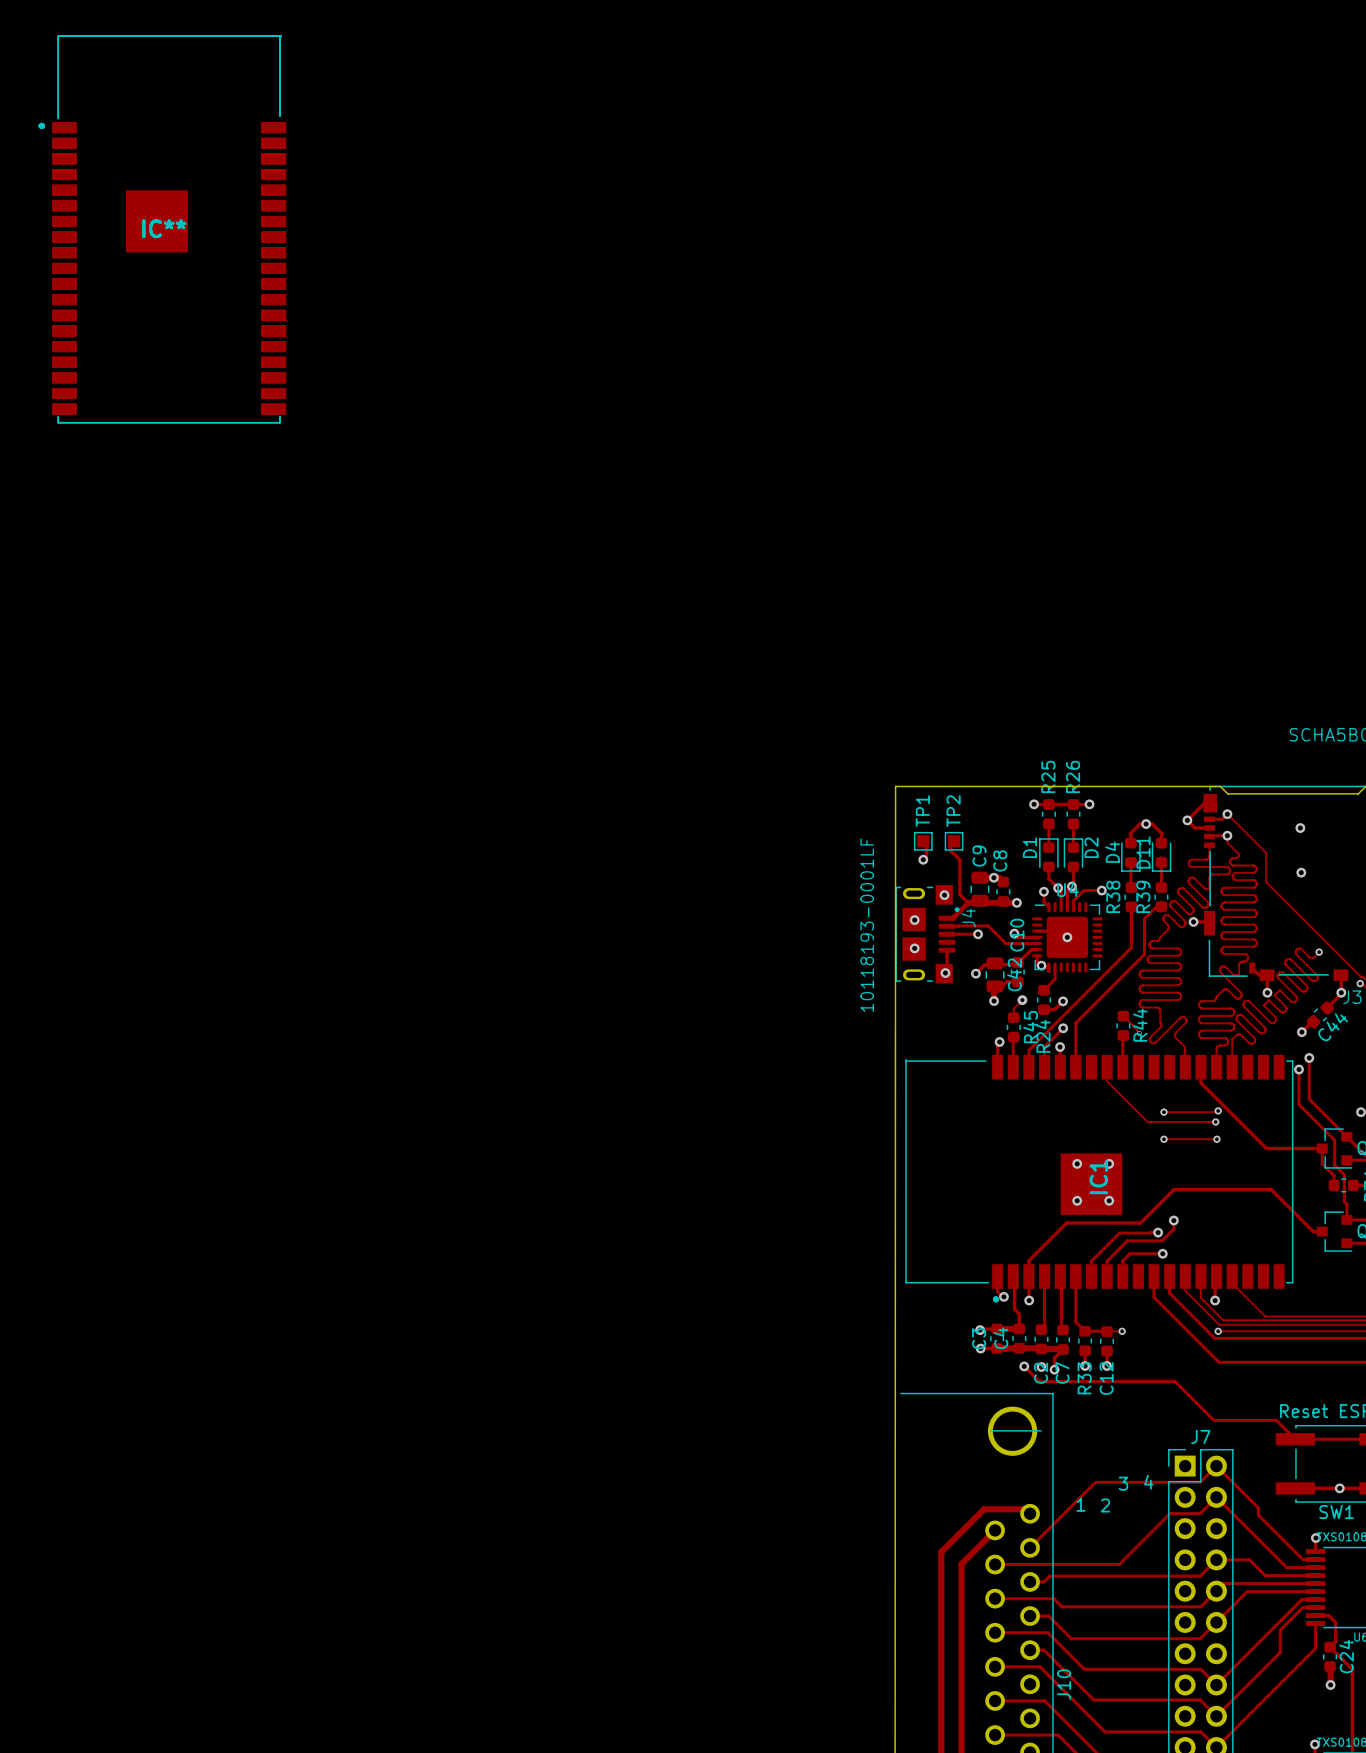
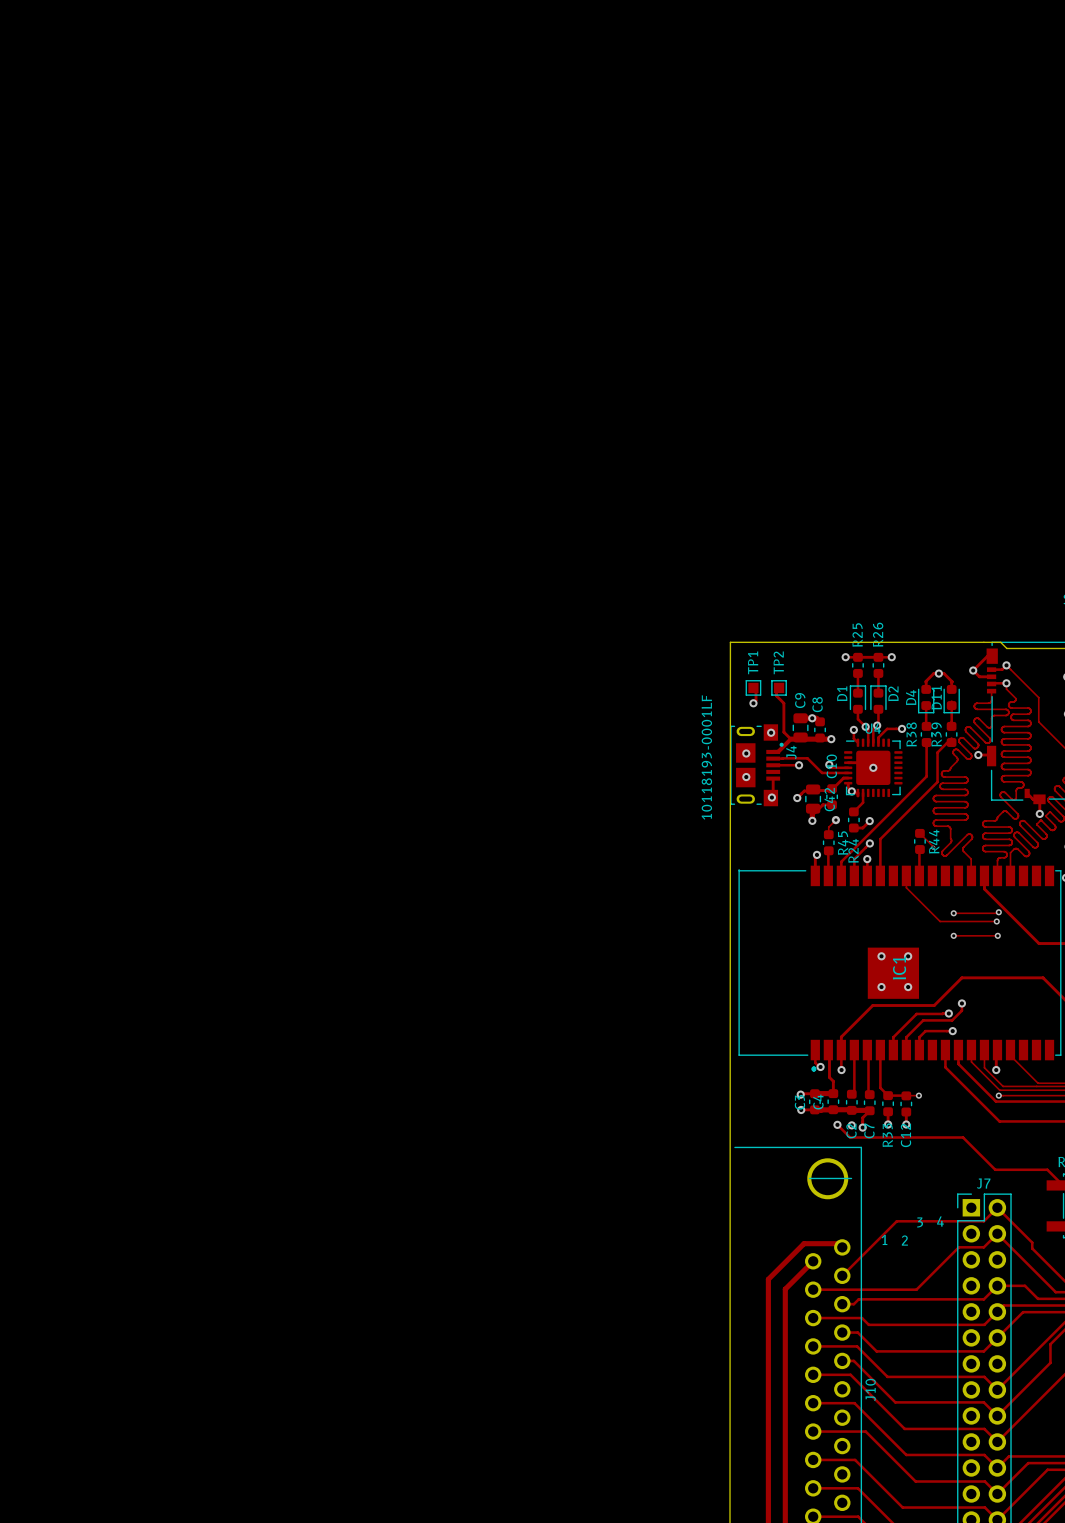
IC**: (162, 229) -> none

